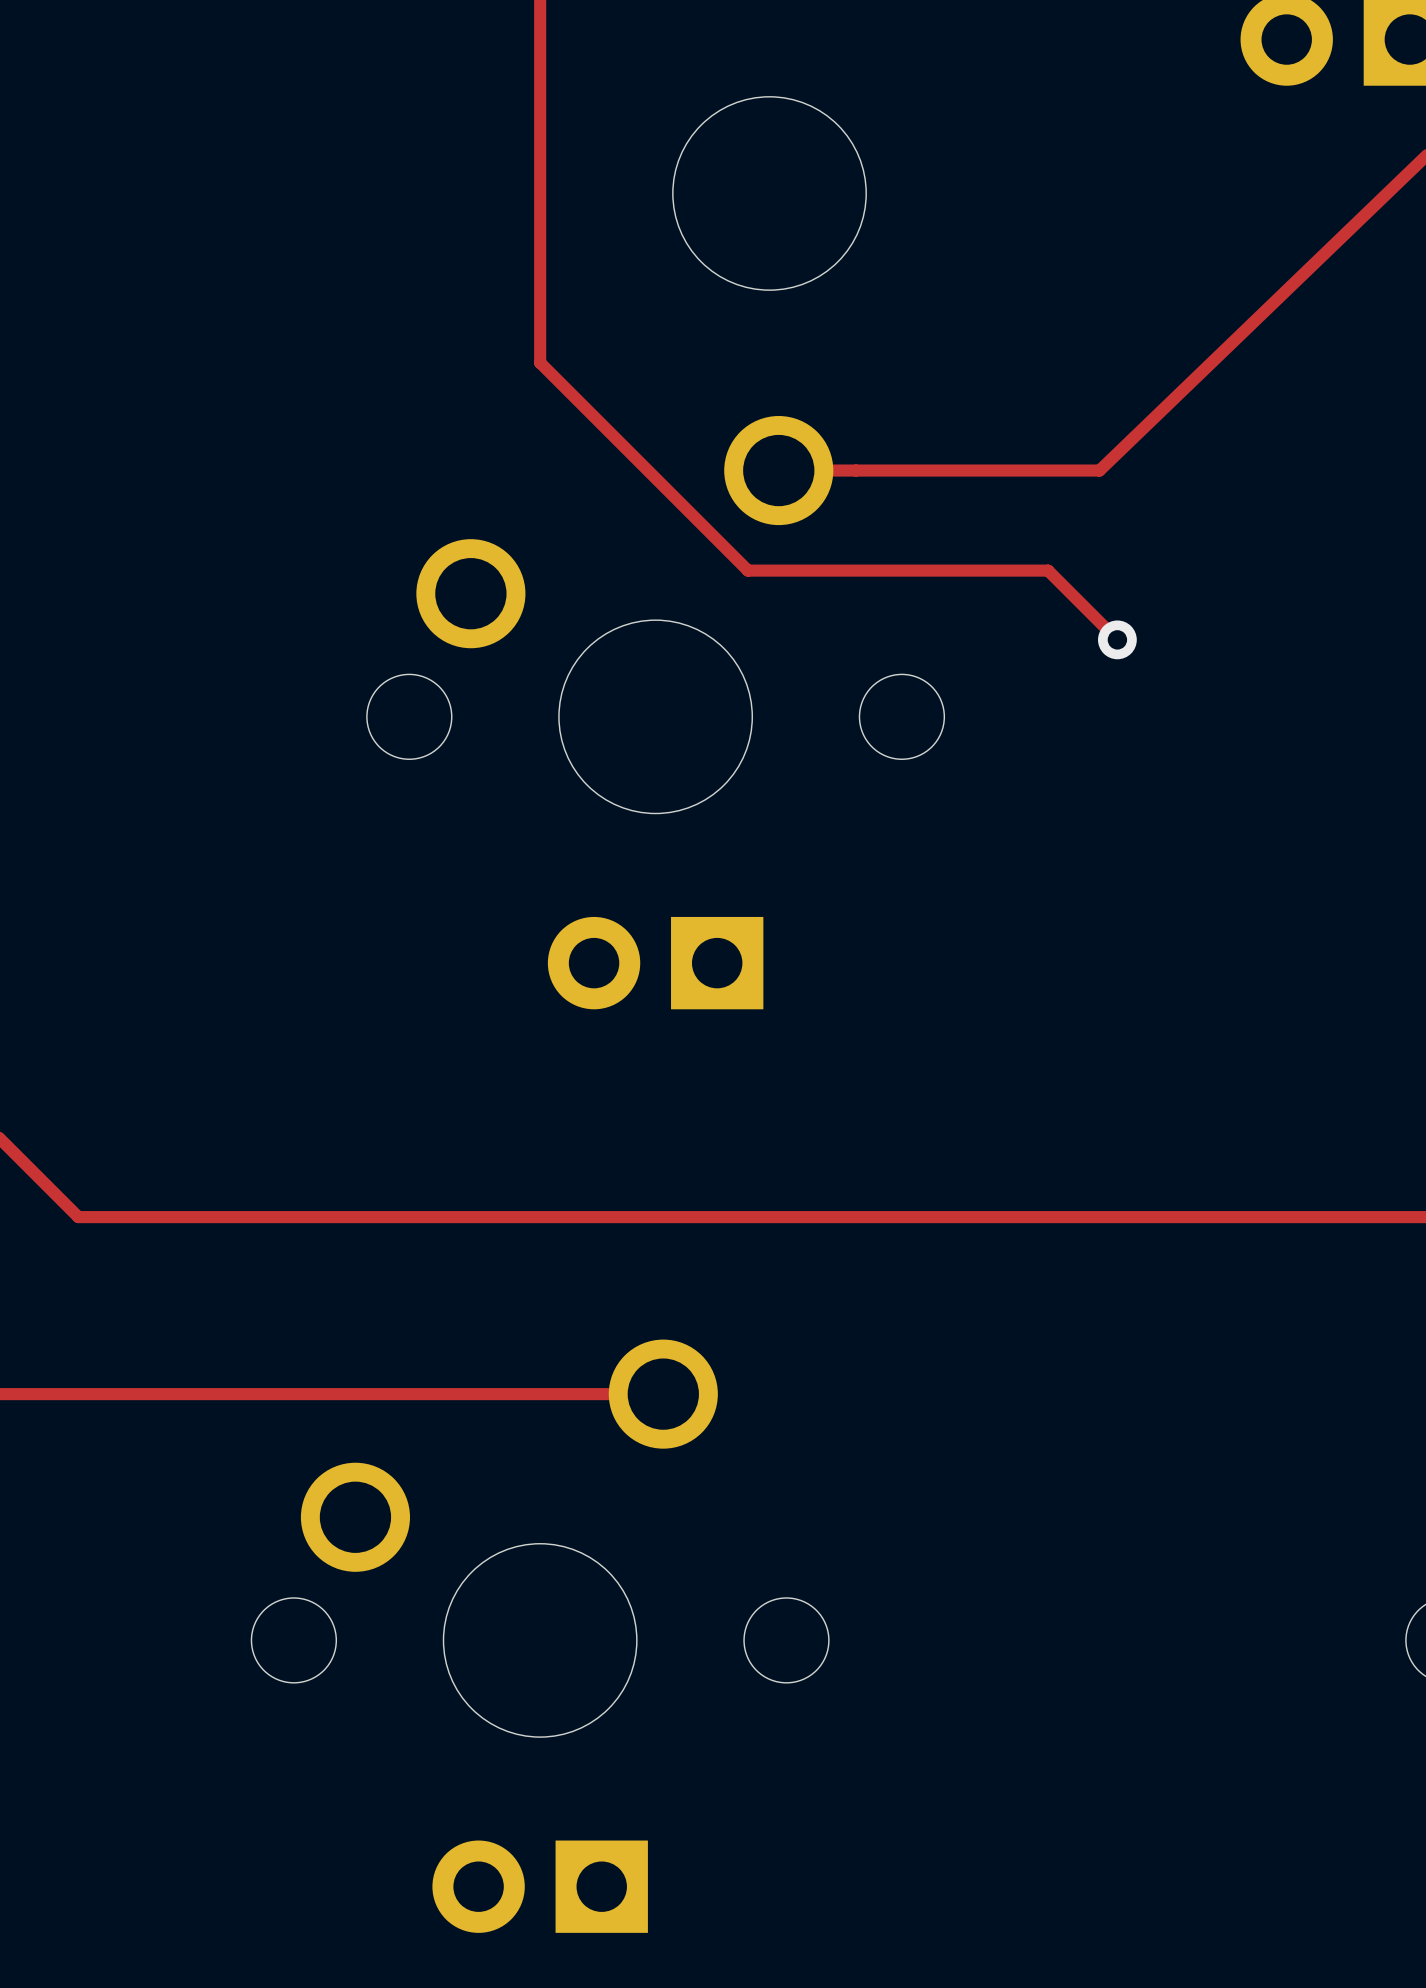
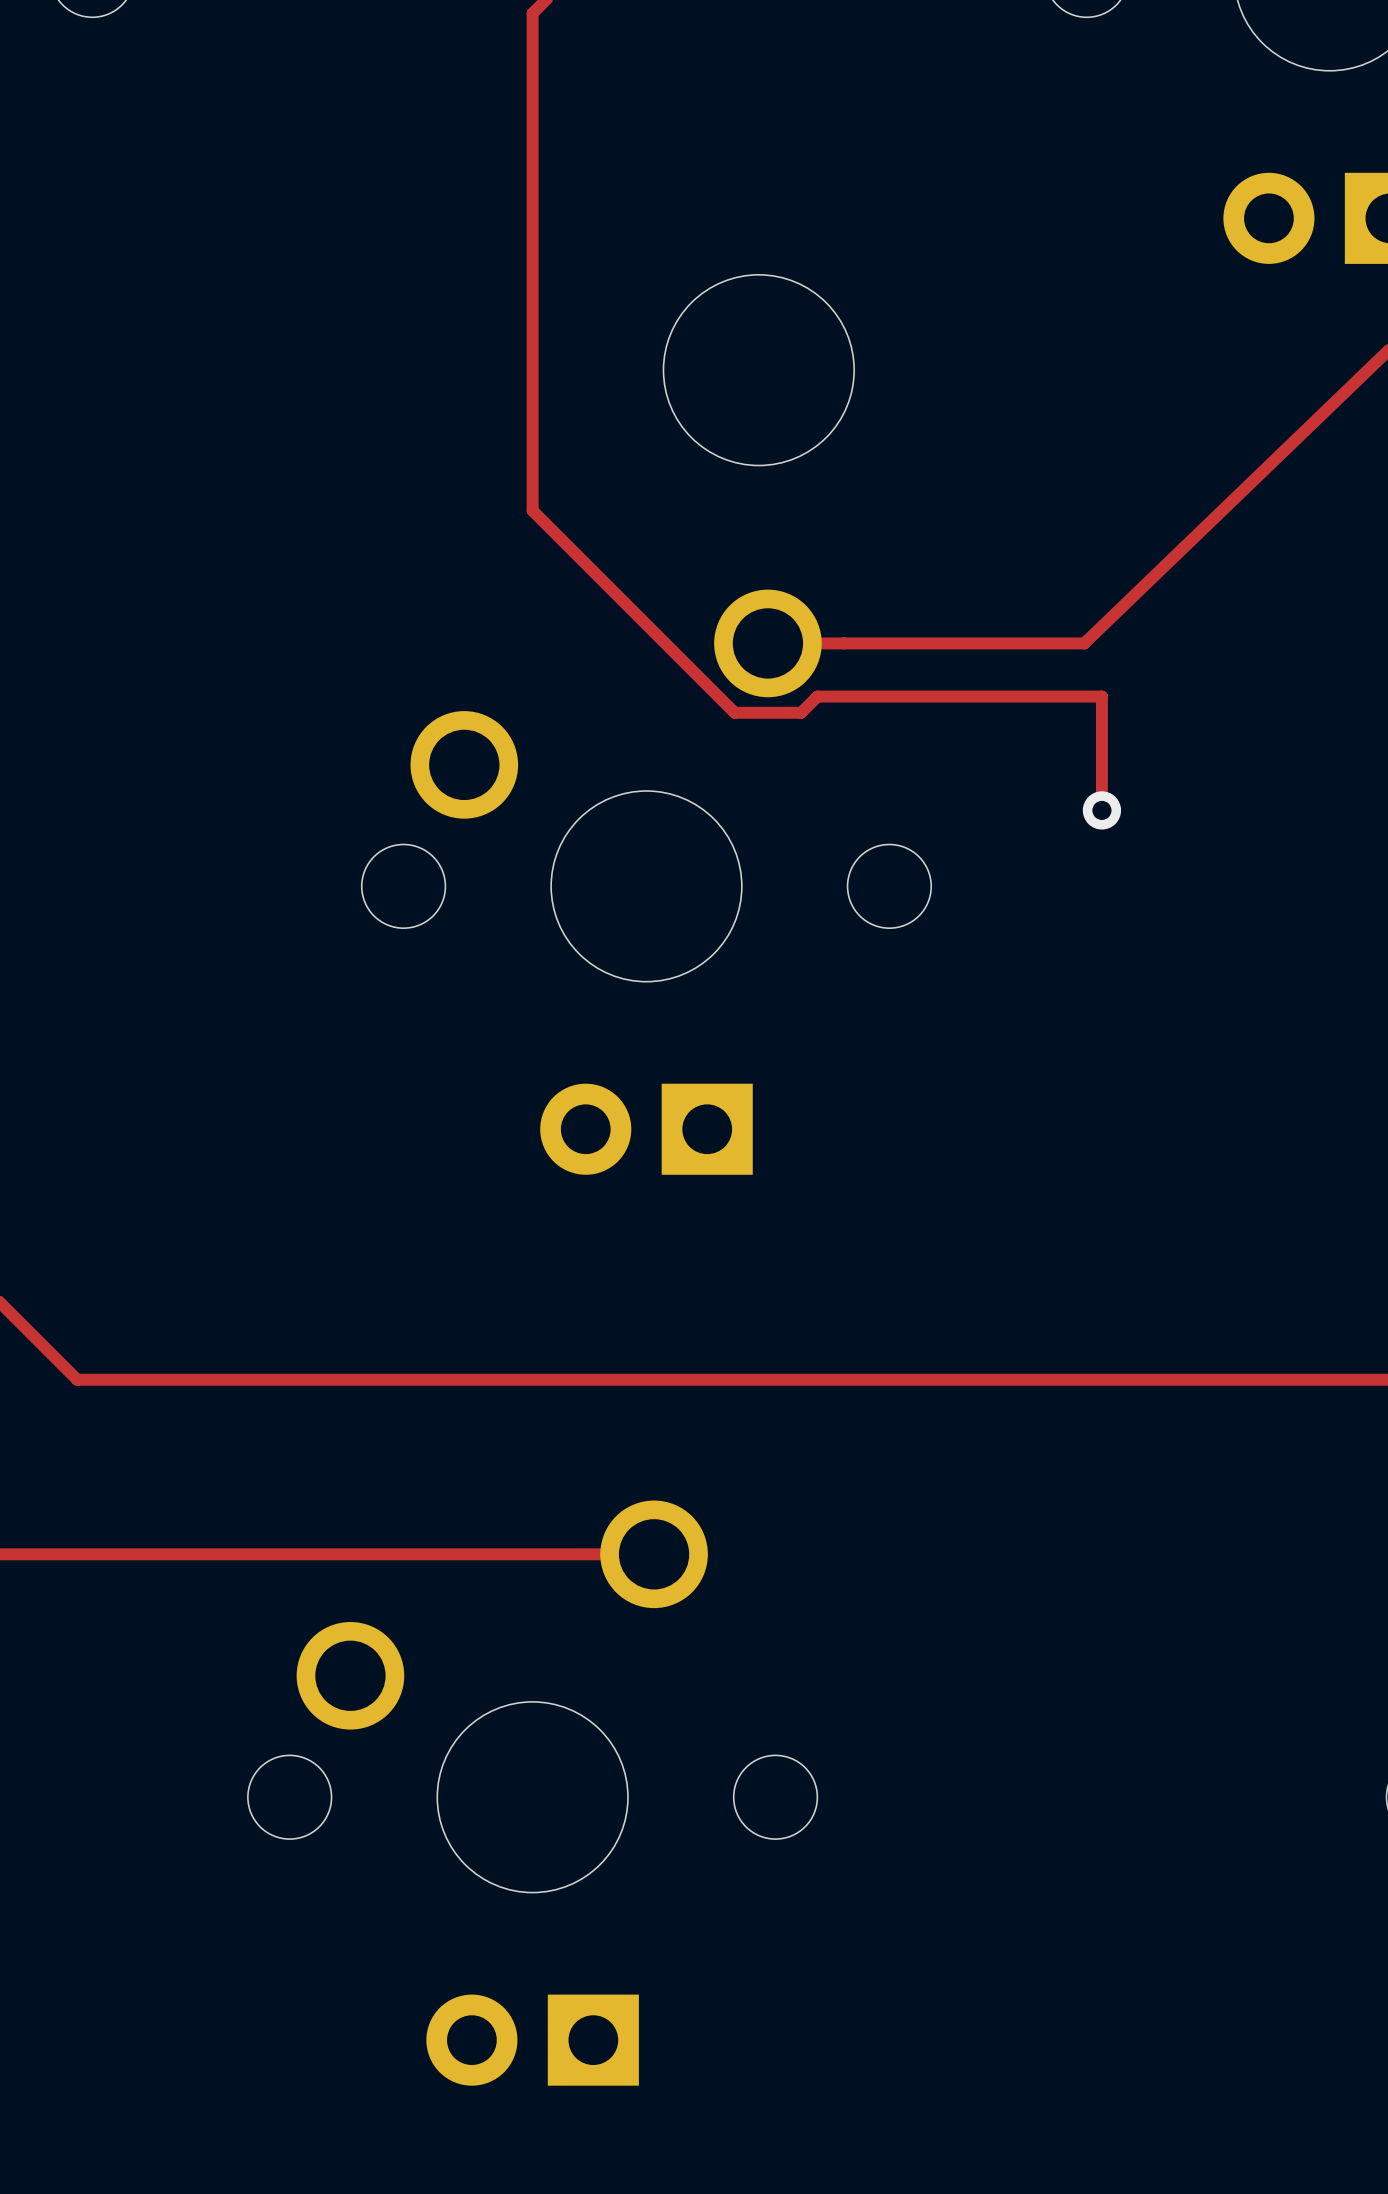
track: (540, 336) (540, 362) (747, 570) (1048, 570) (1117, 639) -> (532, 510) (734, 712) (801, 712) (817, 696) (1101, 696) (1101, 810)

